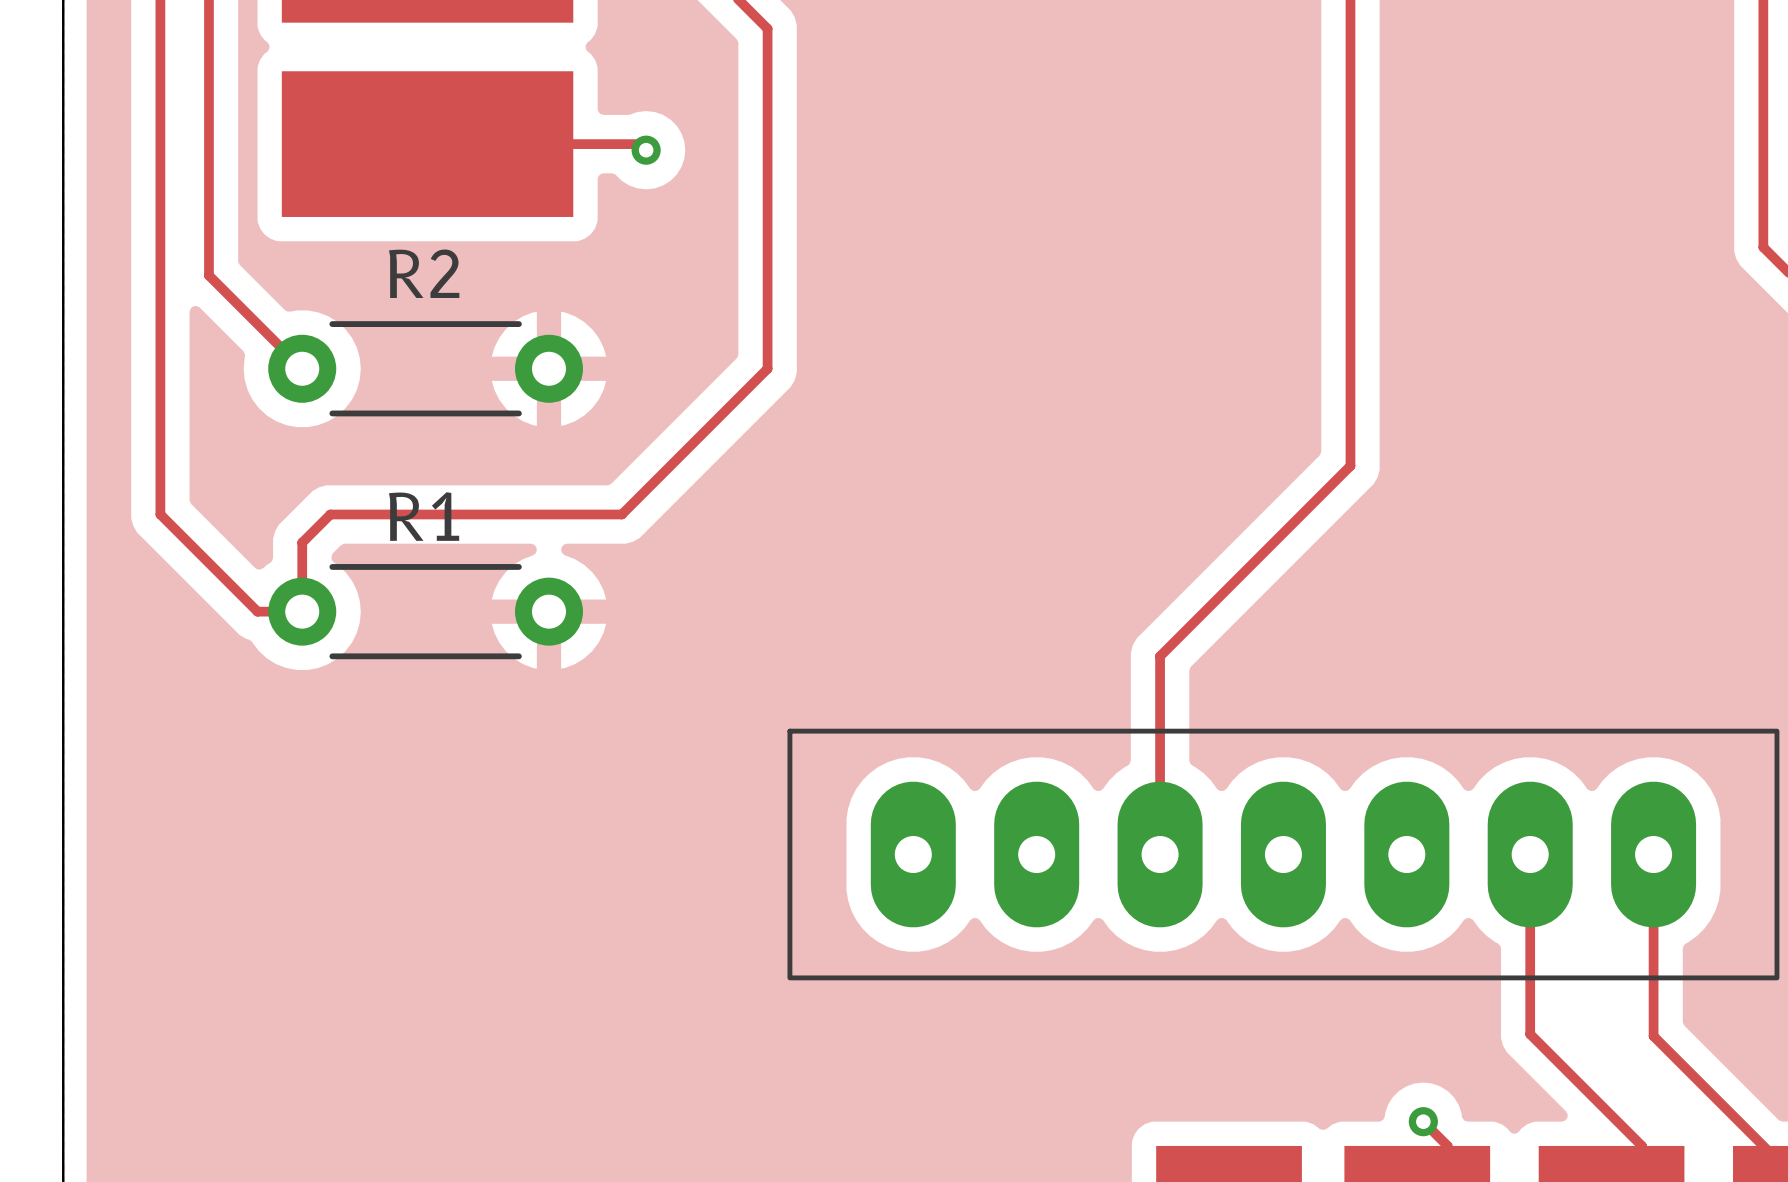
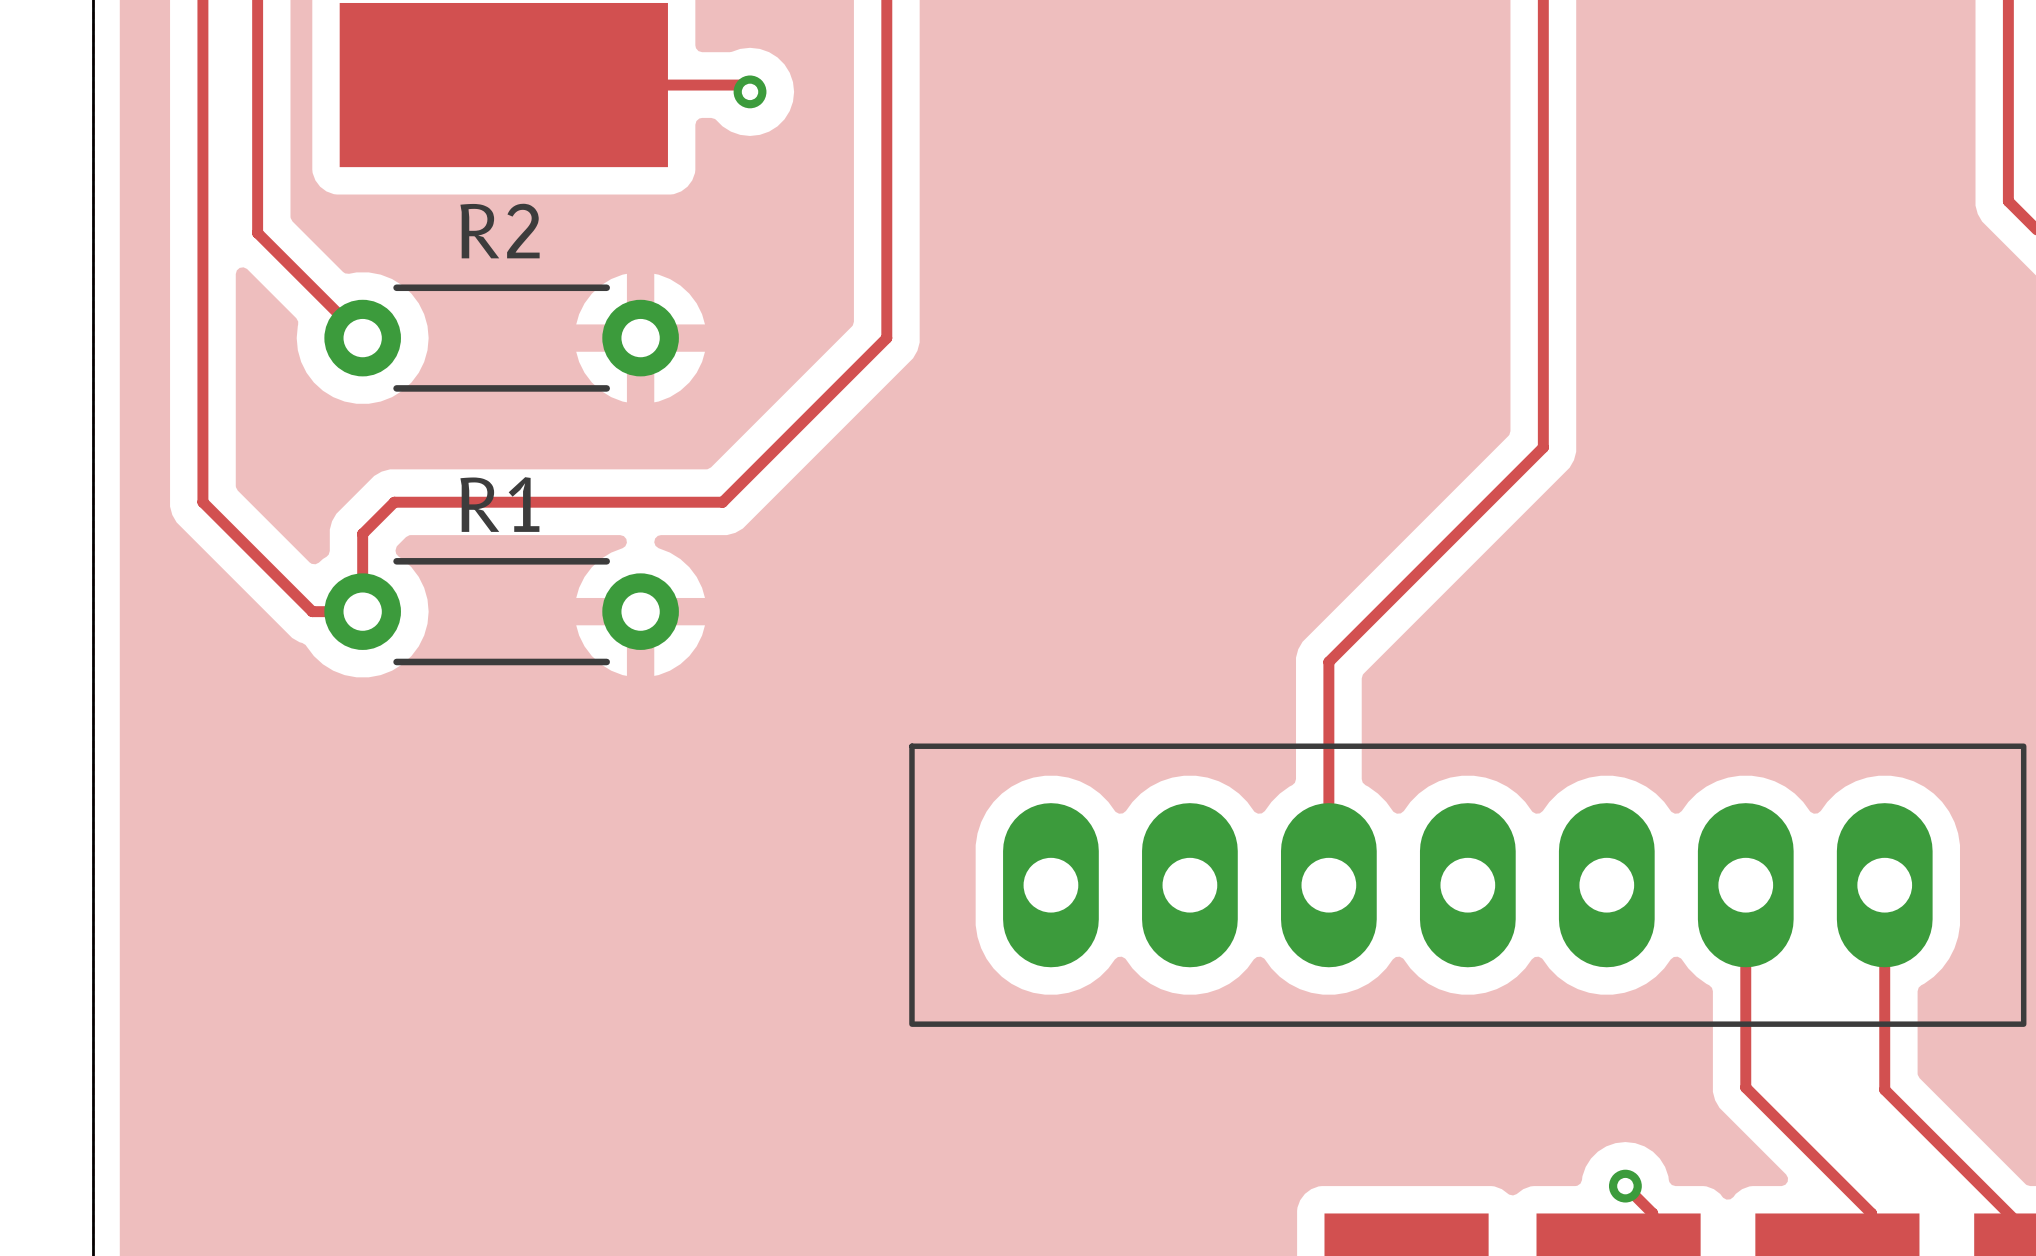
part footprint: [787, 728, 1780, 981] -> [909, 743, 2027, 1027]

